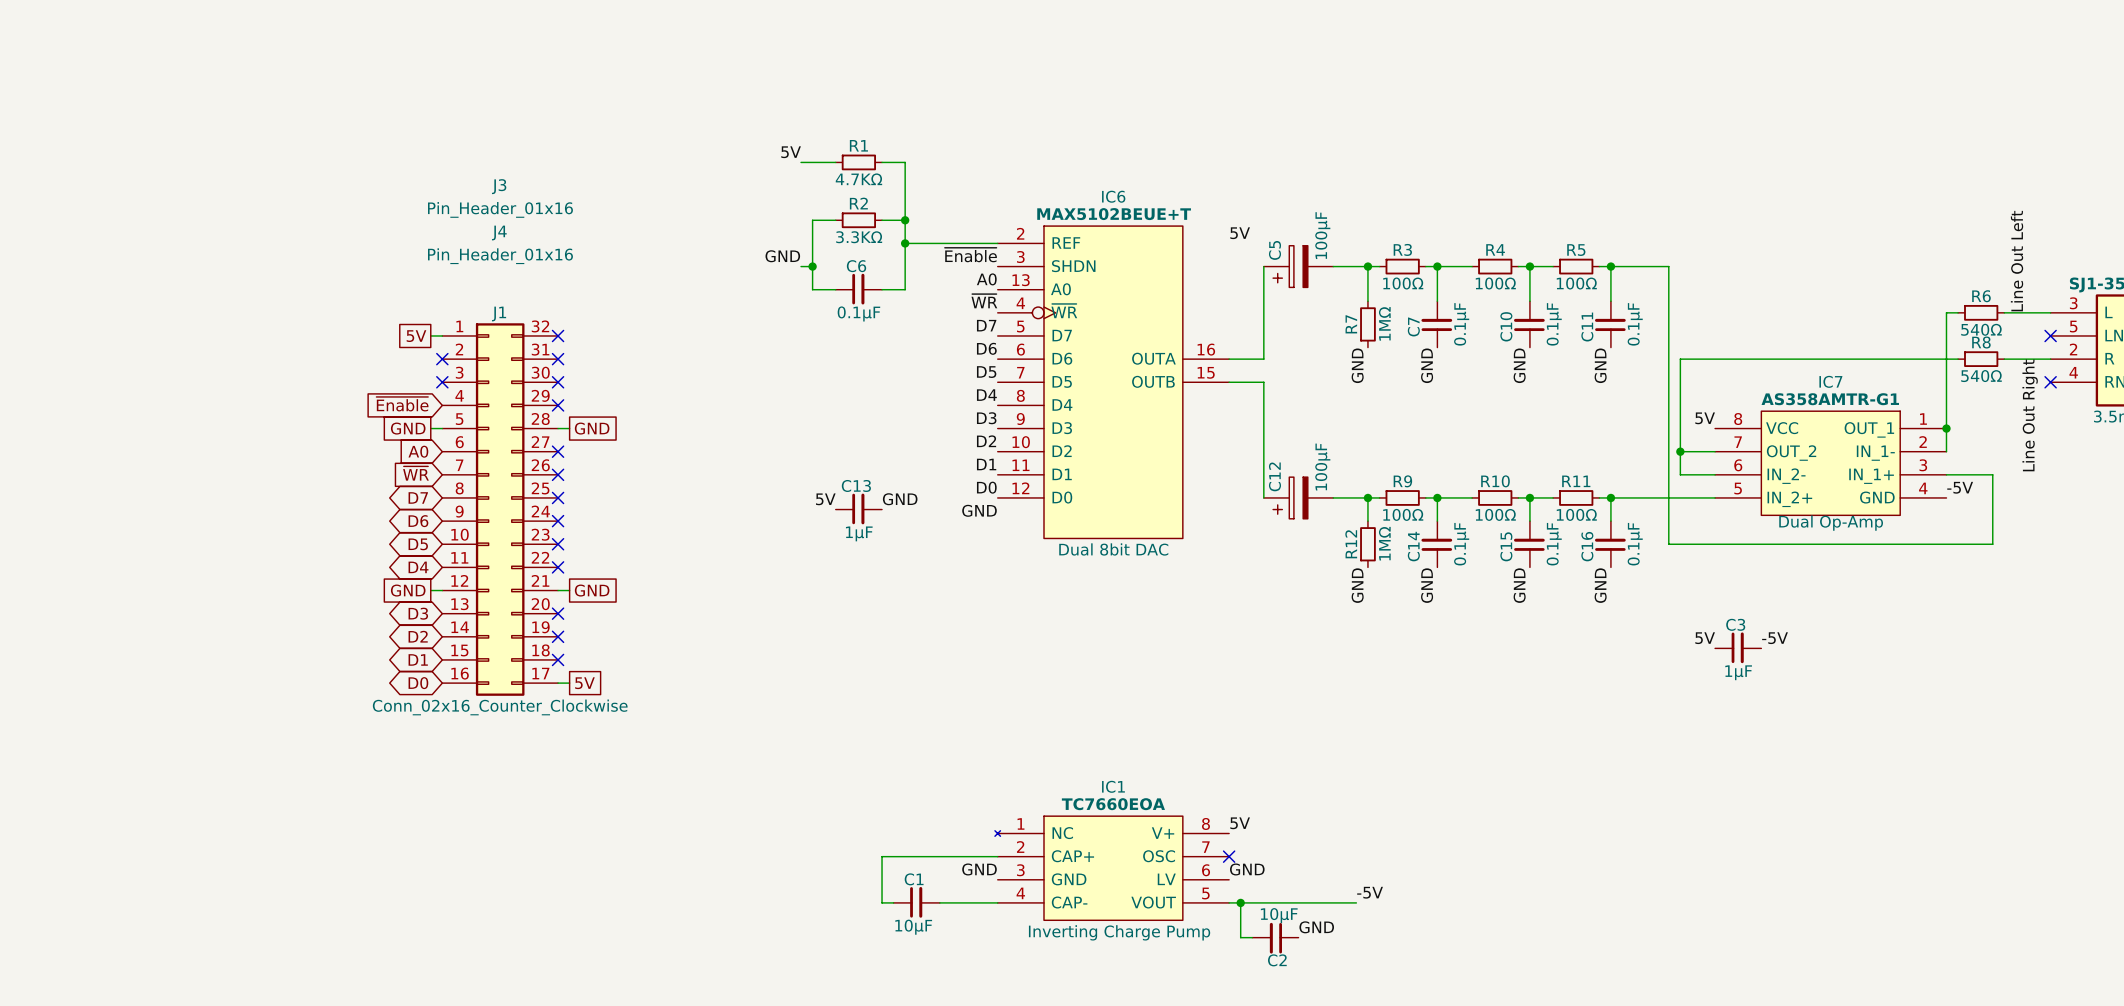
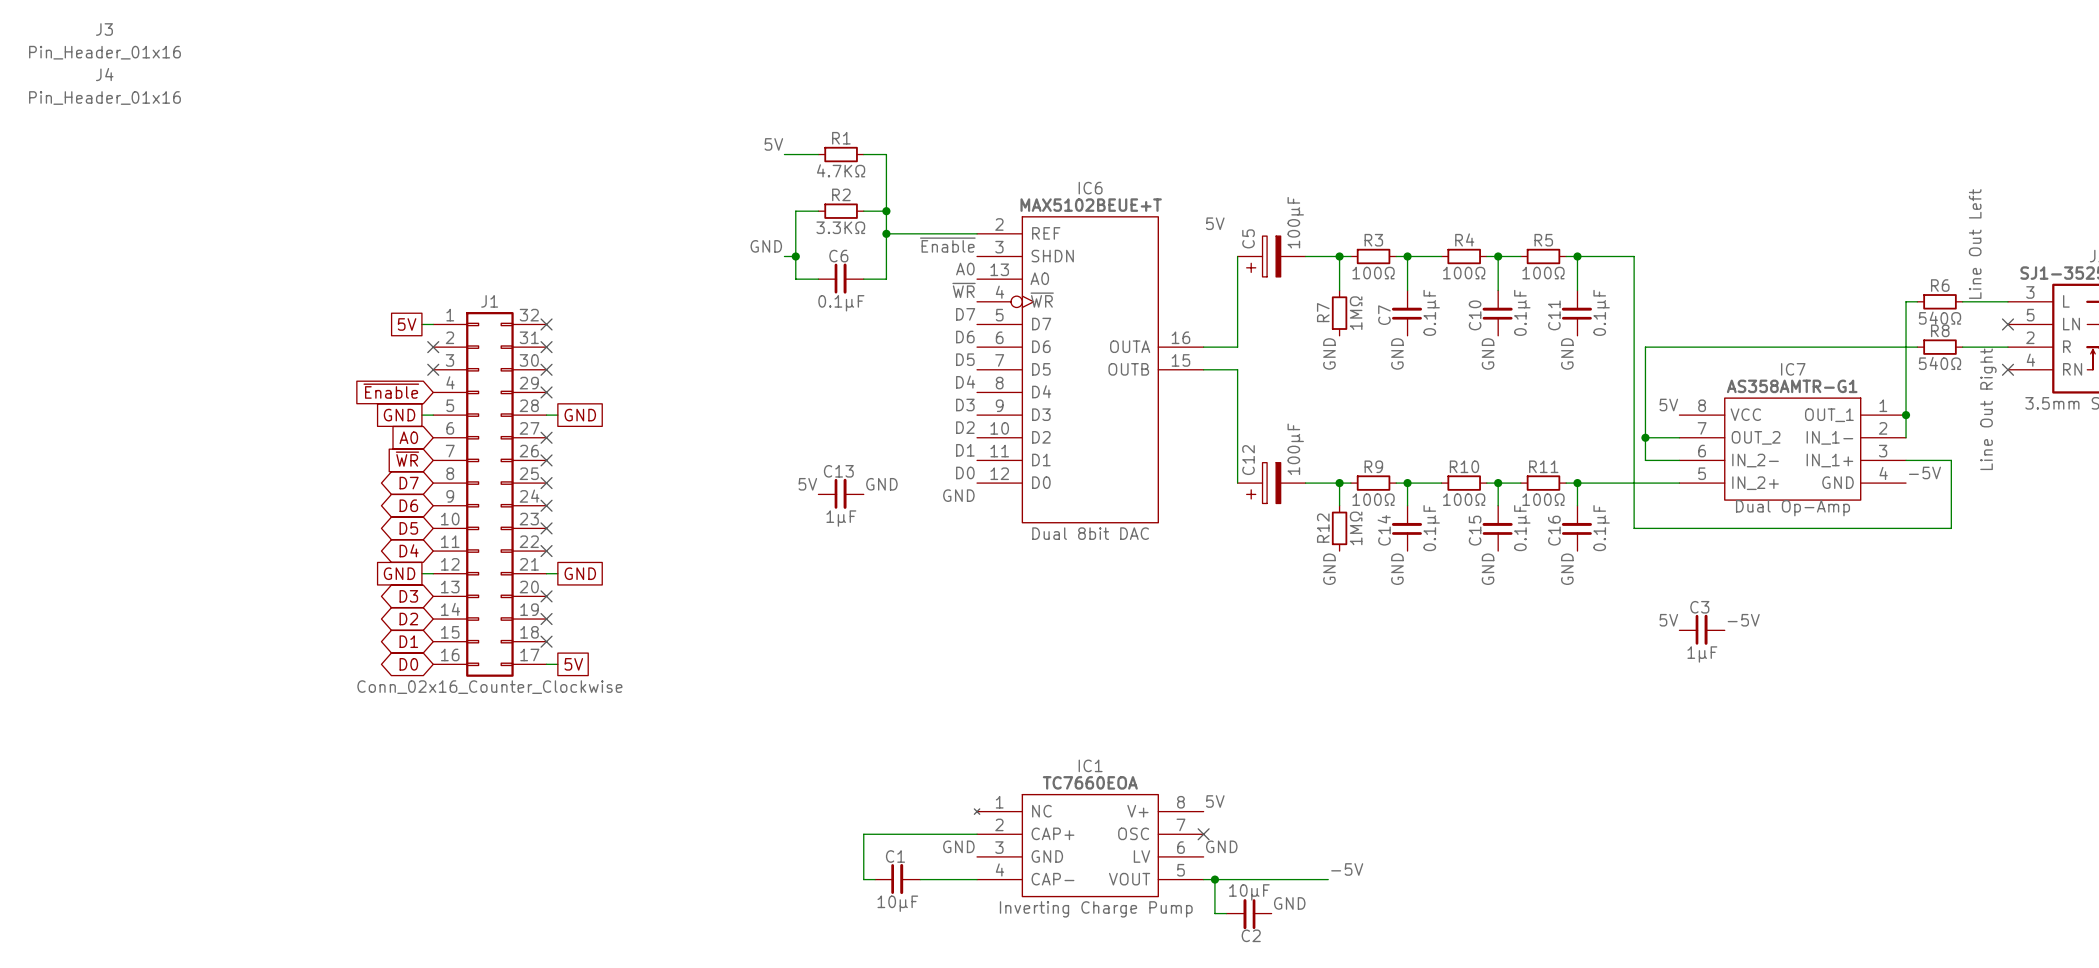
J3 position: (500, 198) -> (104, 41)
J4 position: (500, 244) -> (104, 86)

